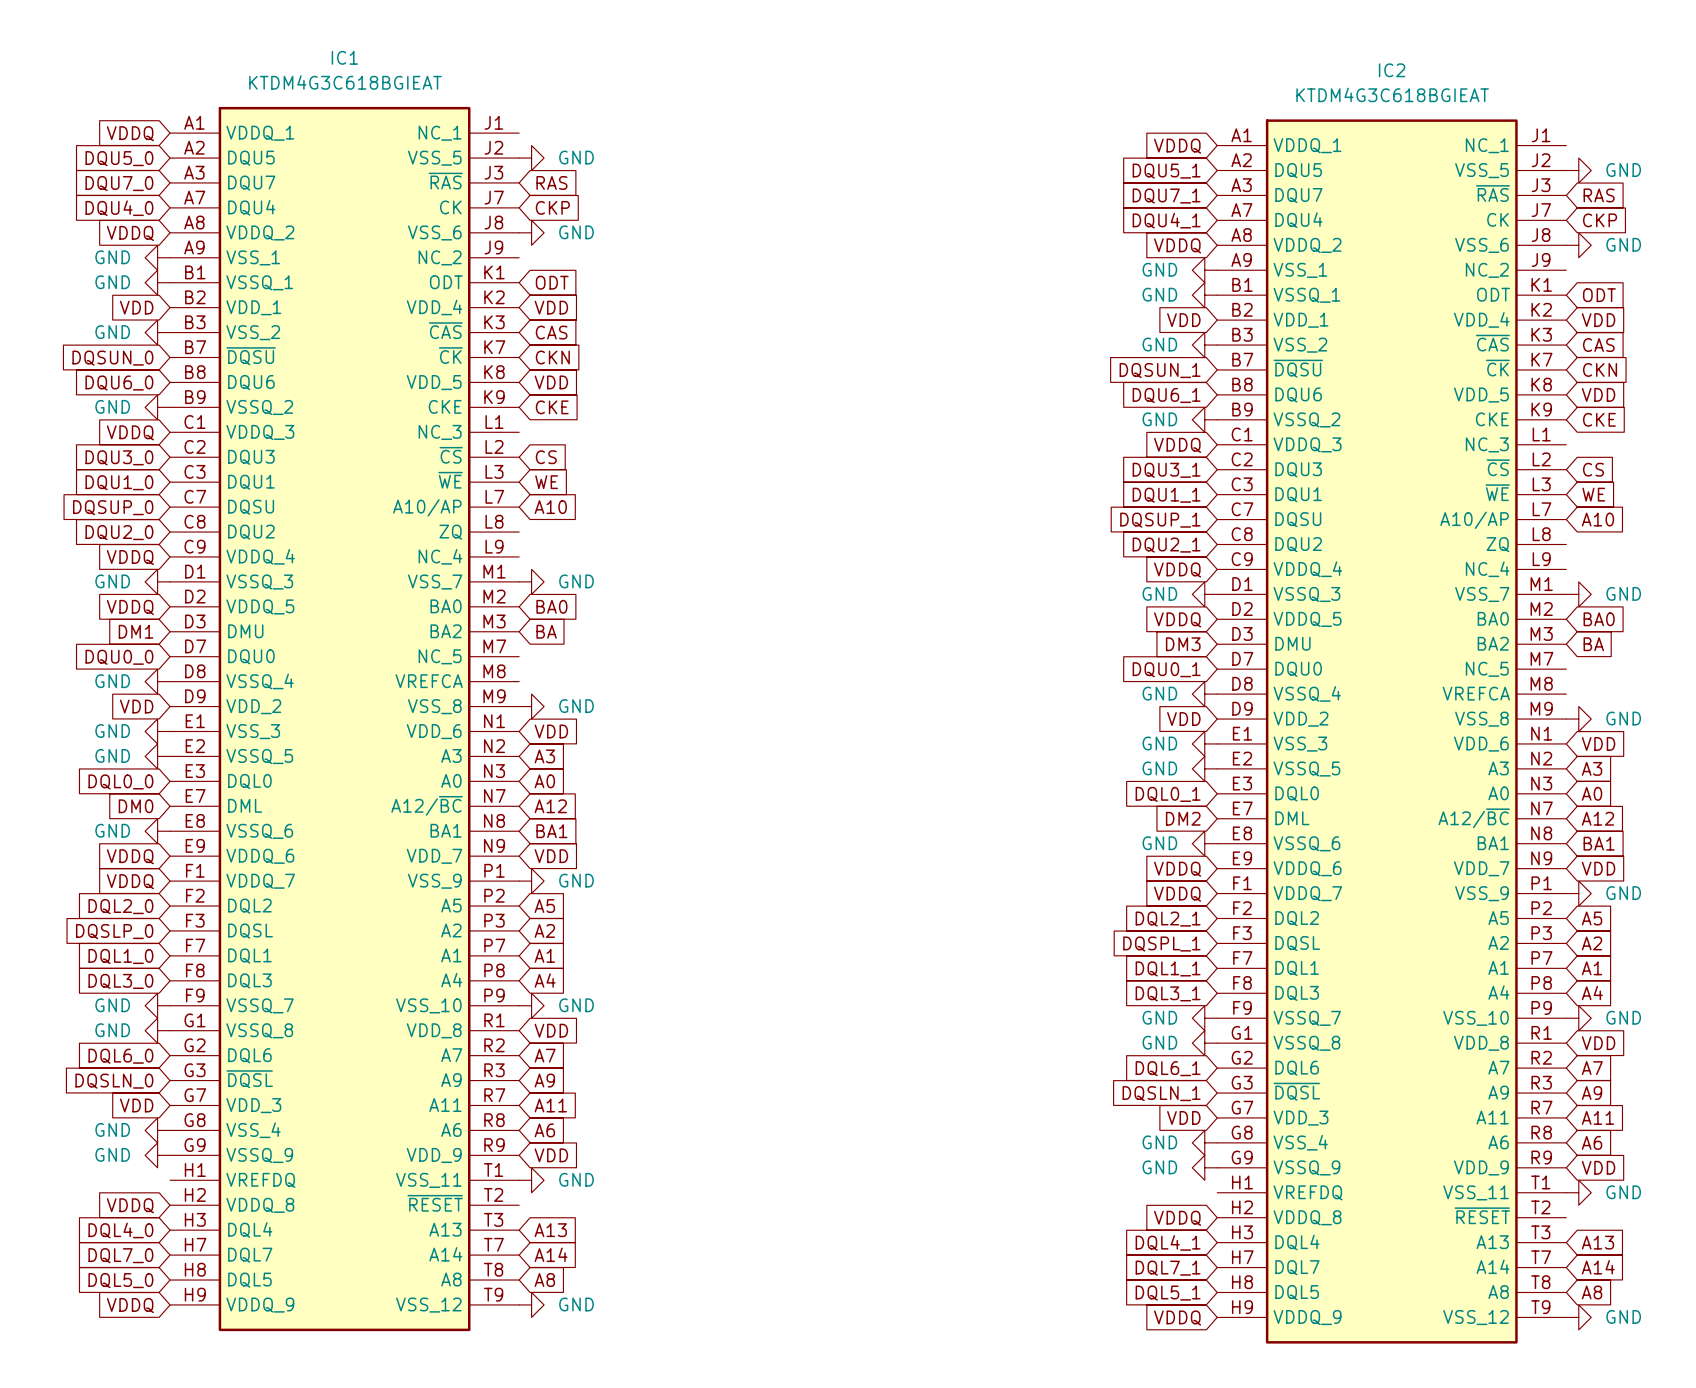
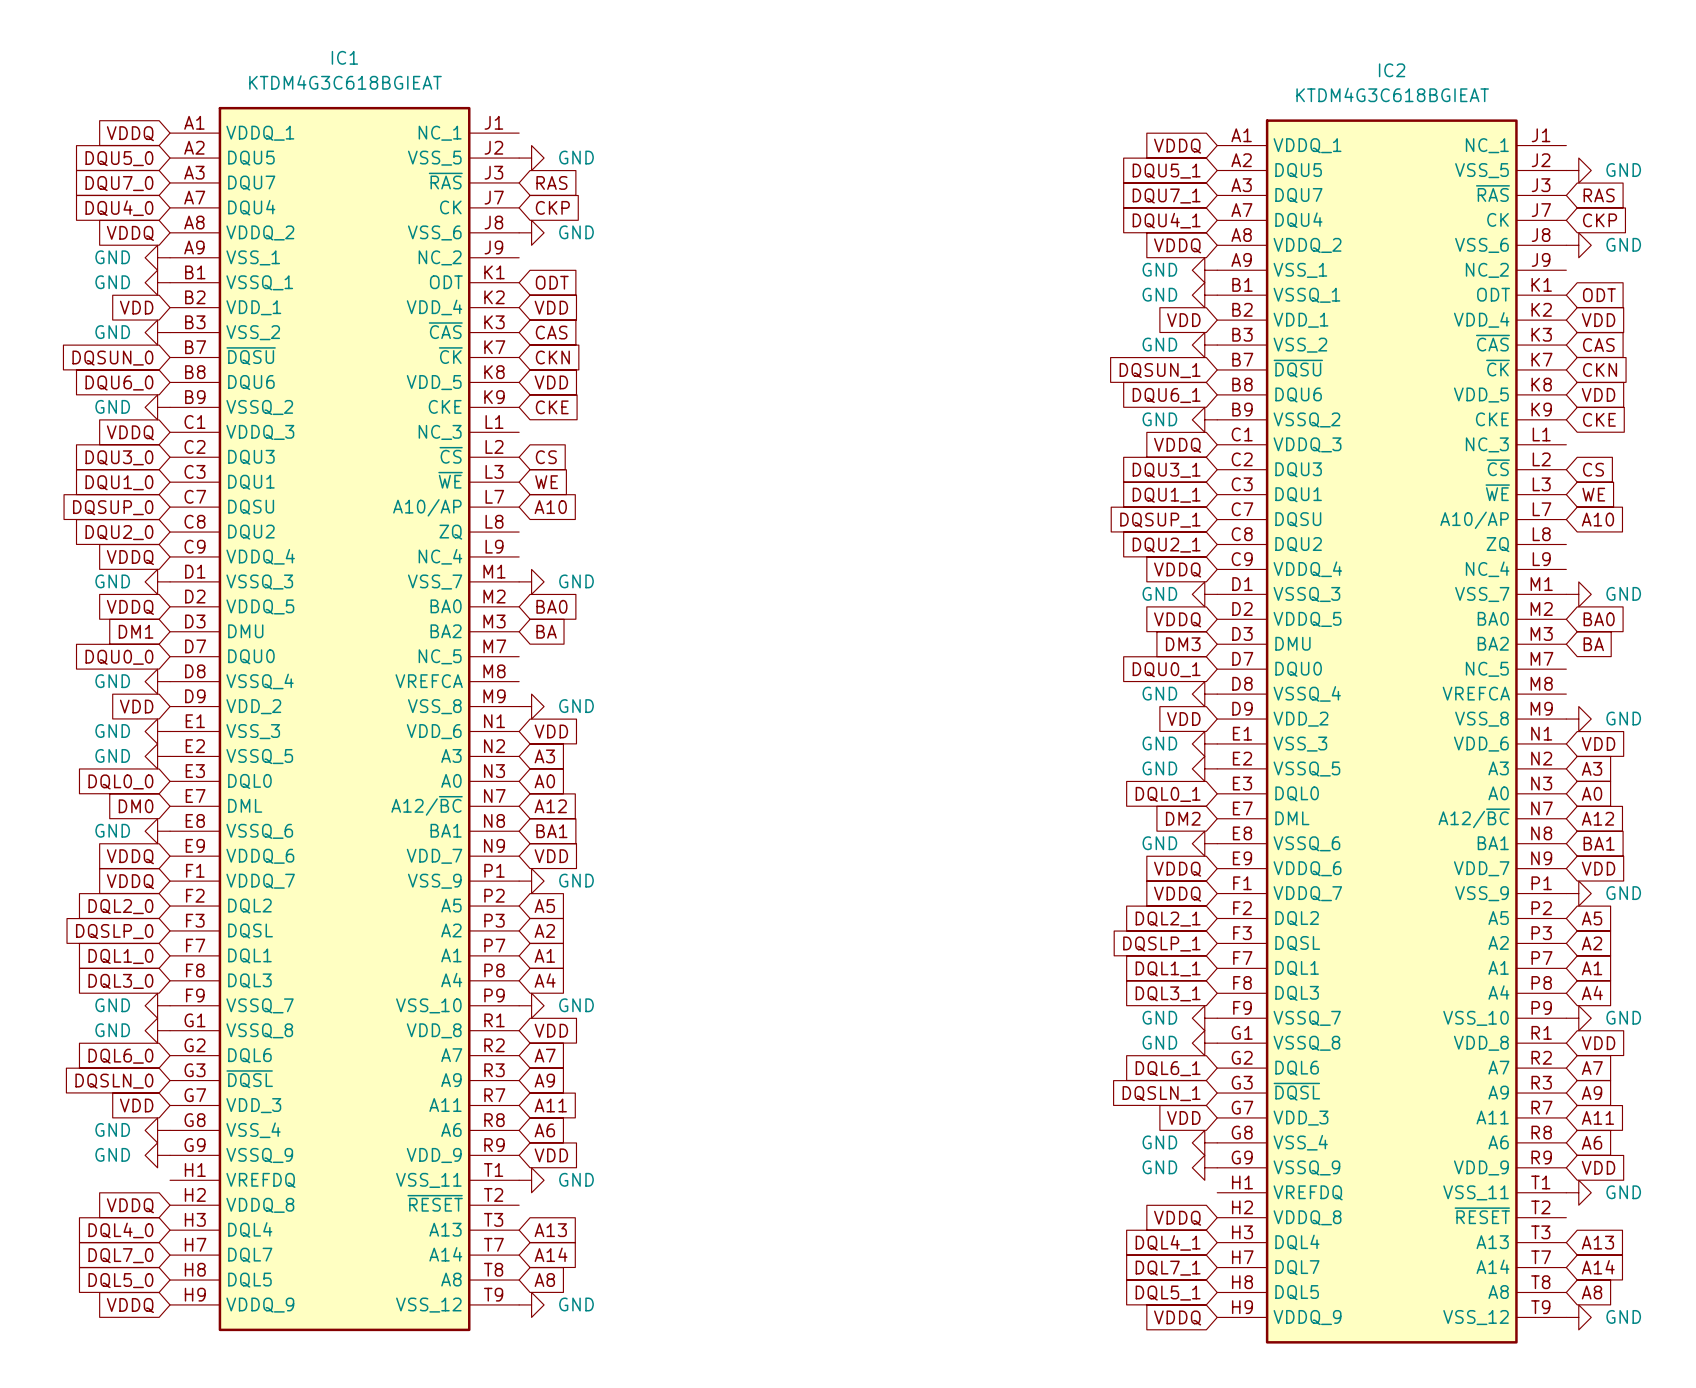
global label: DQSPL_1 (1161, 944) -> DQSLP_1 (1161, 944)

